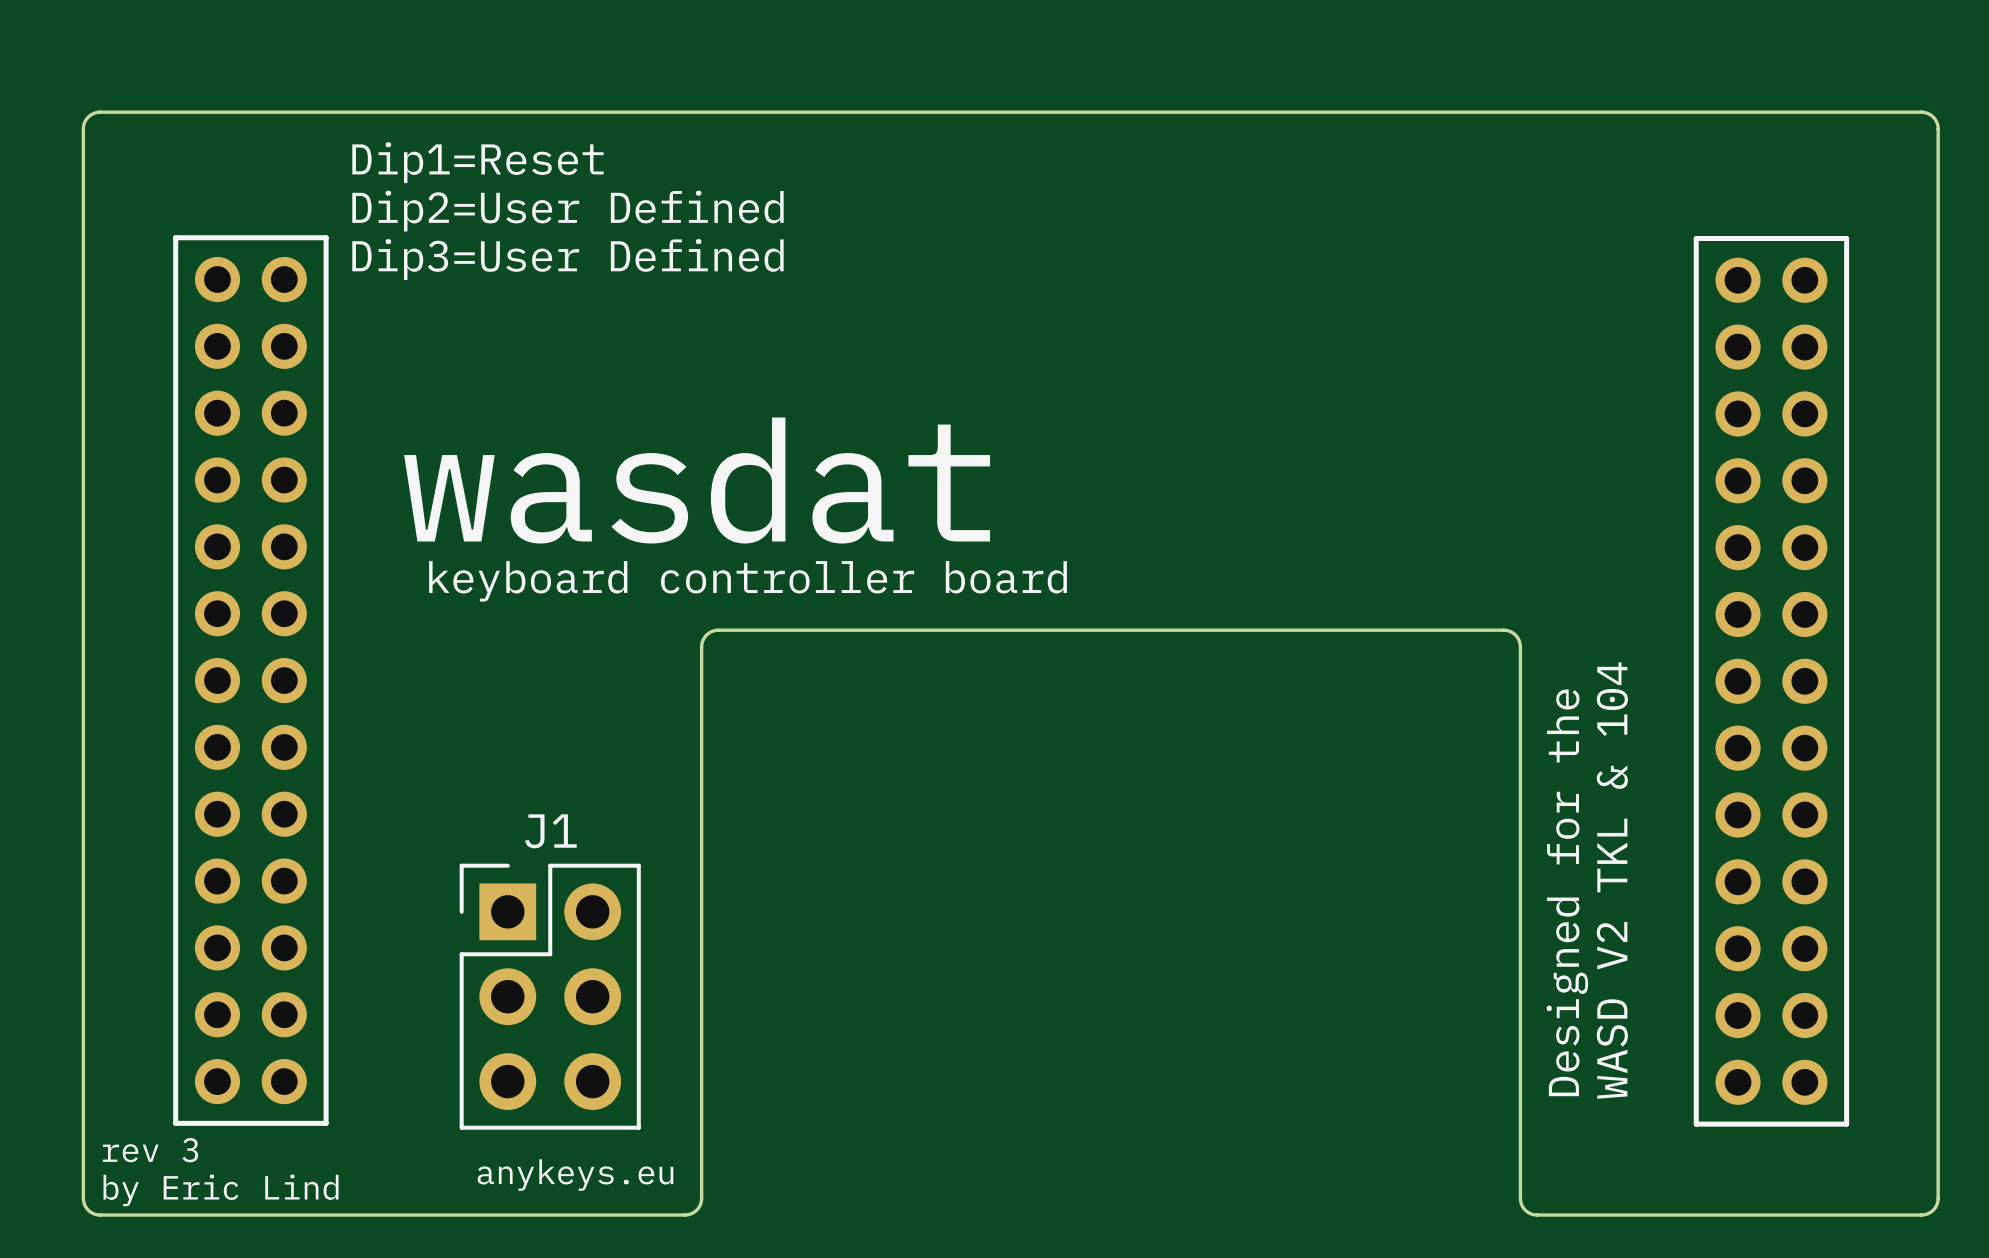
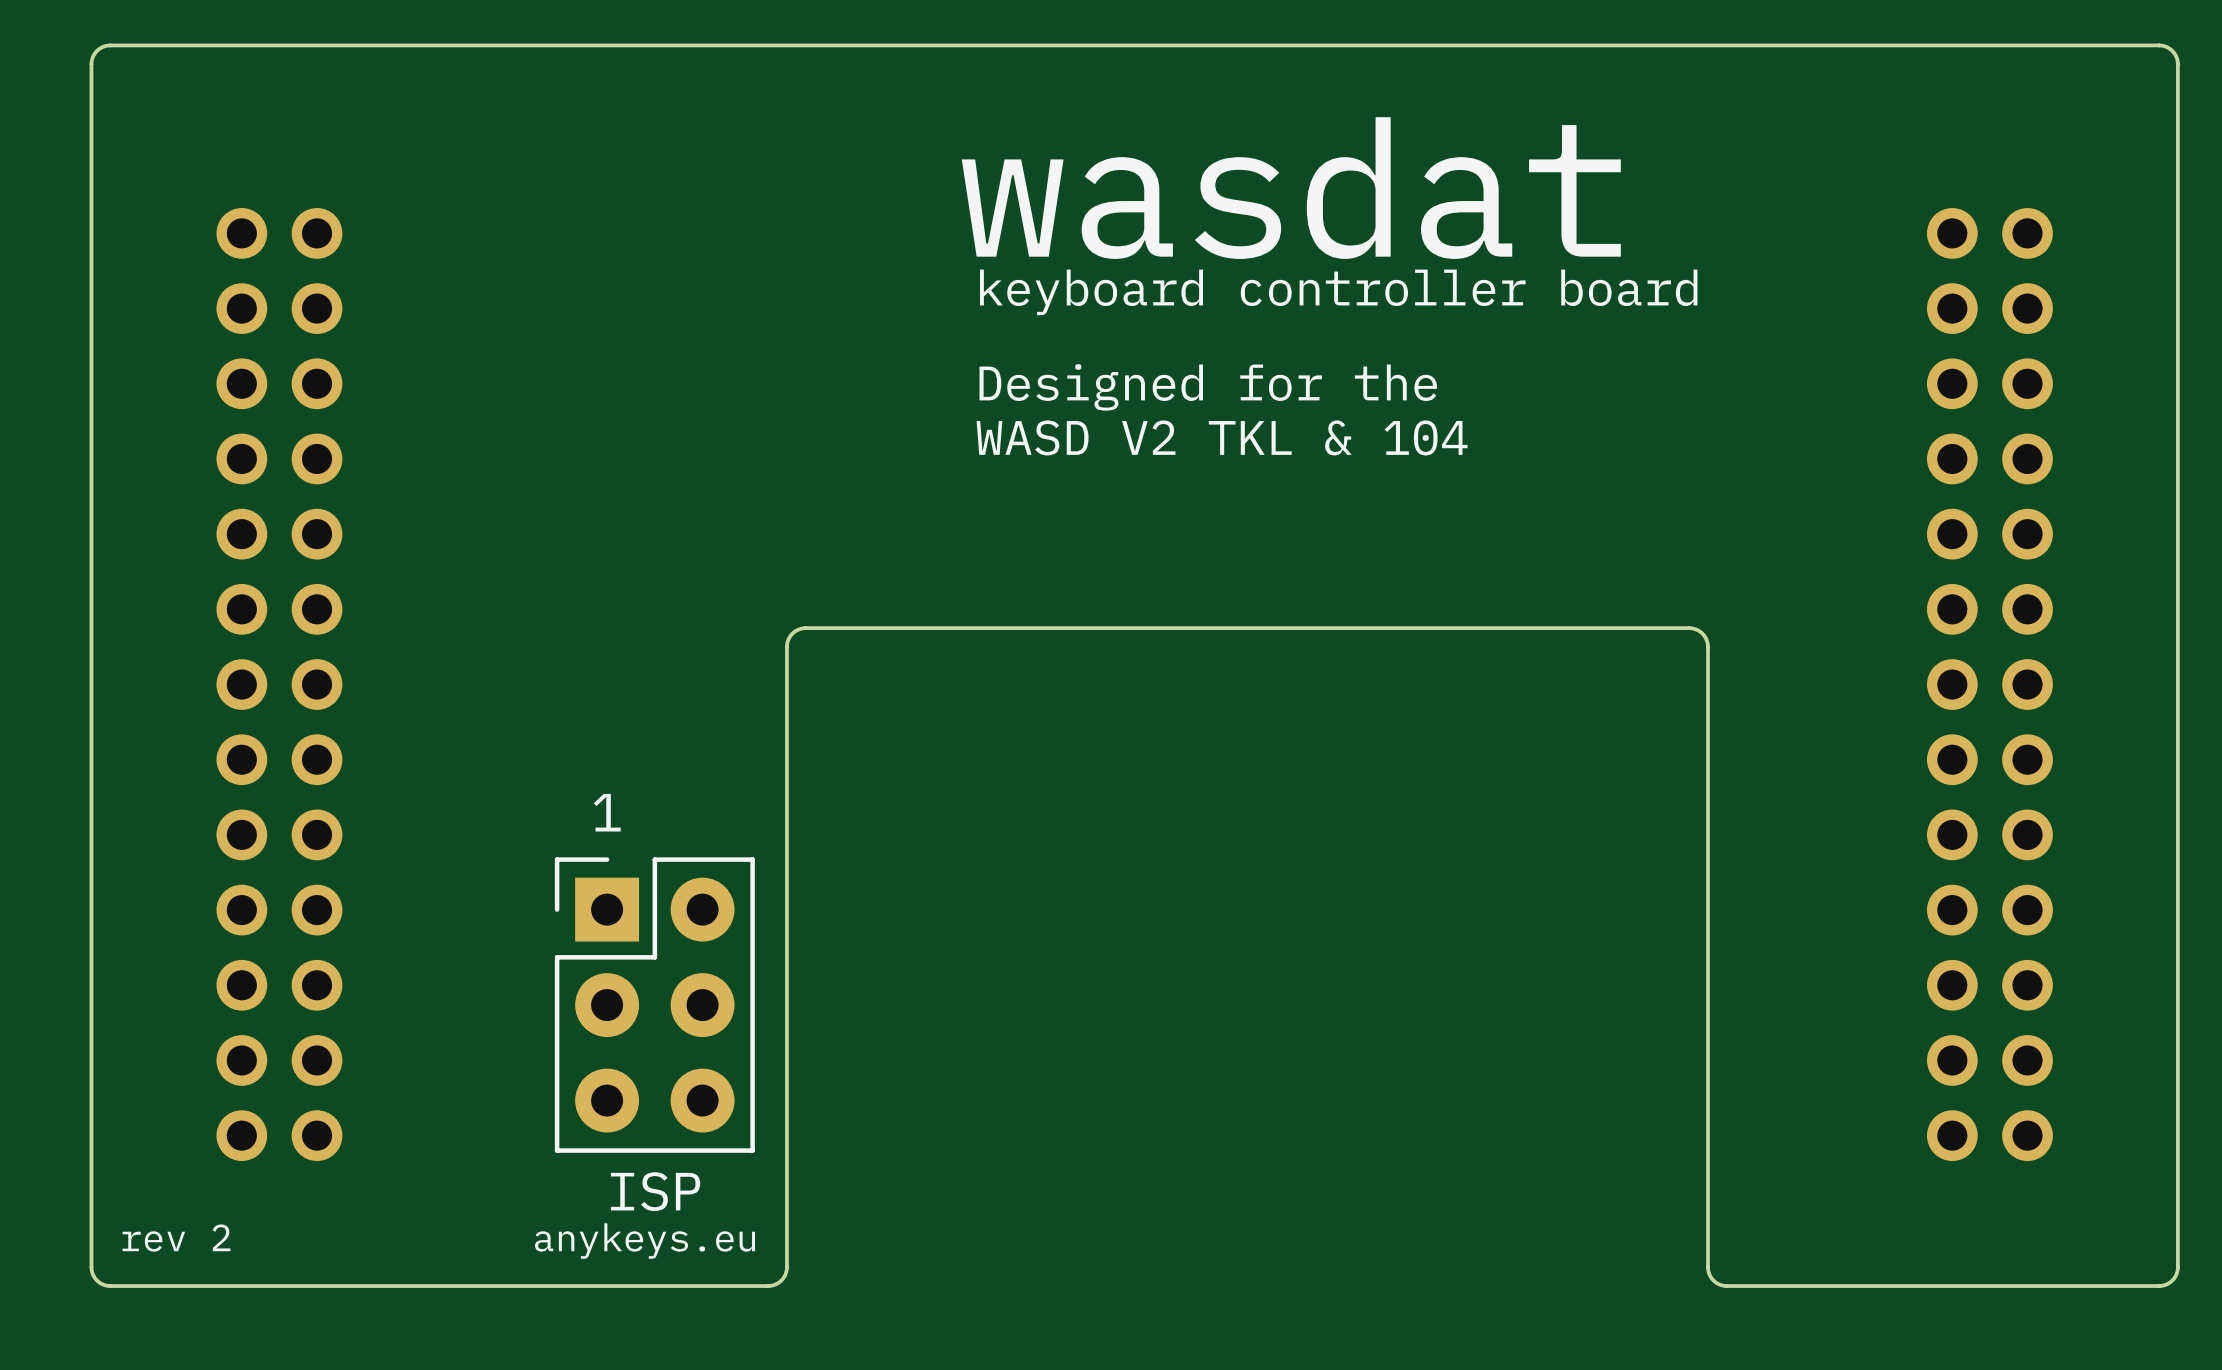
text: Dip1=Reset (477, 162) -> none
text: Dip2=User Defined (567, 211) -> none
text: Dip3=User Defined (567, 259) -> none
text: none -> Designed for the (1208, 387)
text: none -> WASD V2 TKL & 104 (1222, 437)
text position: wasdat (697, 480) -> wasdat (1291, 188)
text position: keyboard controller board (748, 581) -> keyboard controller board (1338, 292)
part side: bottom (250, 680) -> top (279, 684)
part side: bottom (1771, 681) -> top (1989, 684)
text: WASD V2 TKL & 104 (1612, 880) -> none
text: Designed for the (1567, 892) -> none
part: none -> ISP (654, 1005)
J1: (550, 996) -> none
text: rev 3 (150, 1150) -> rev 2 (176, 1238)
text: by Eric Lind (221, 1190) -> none

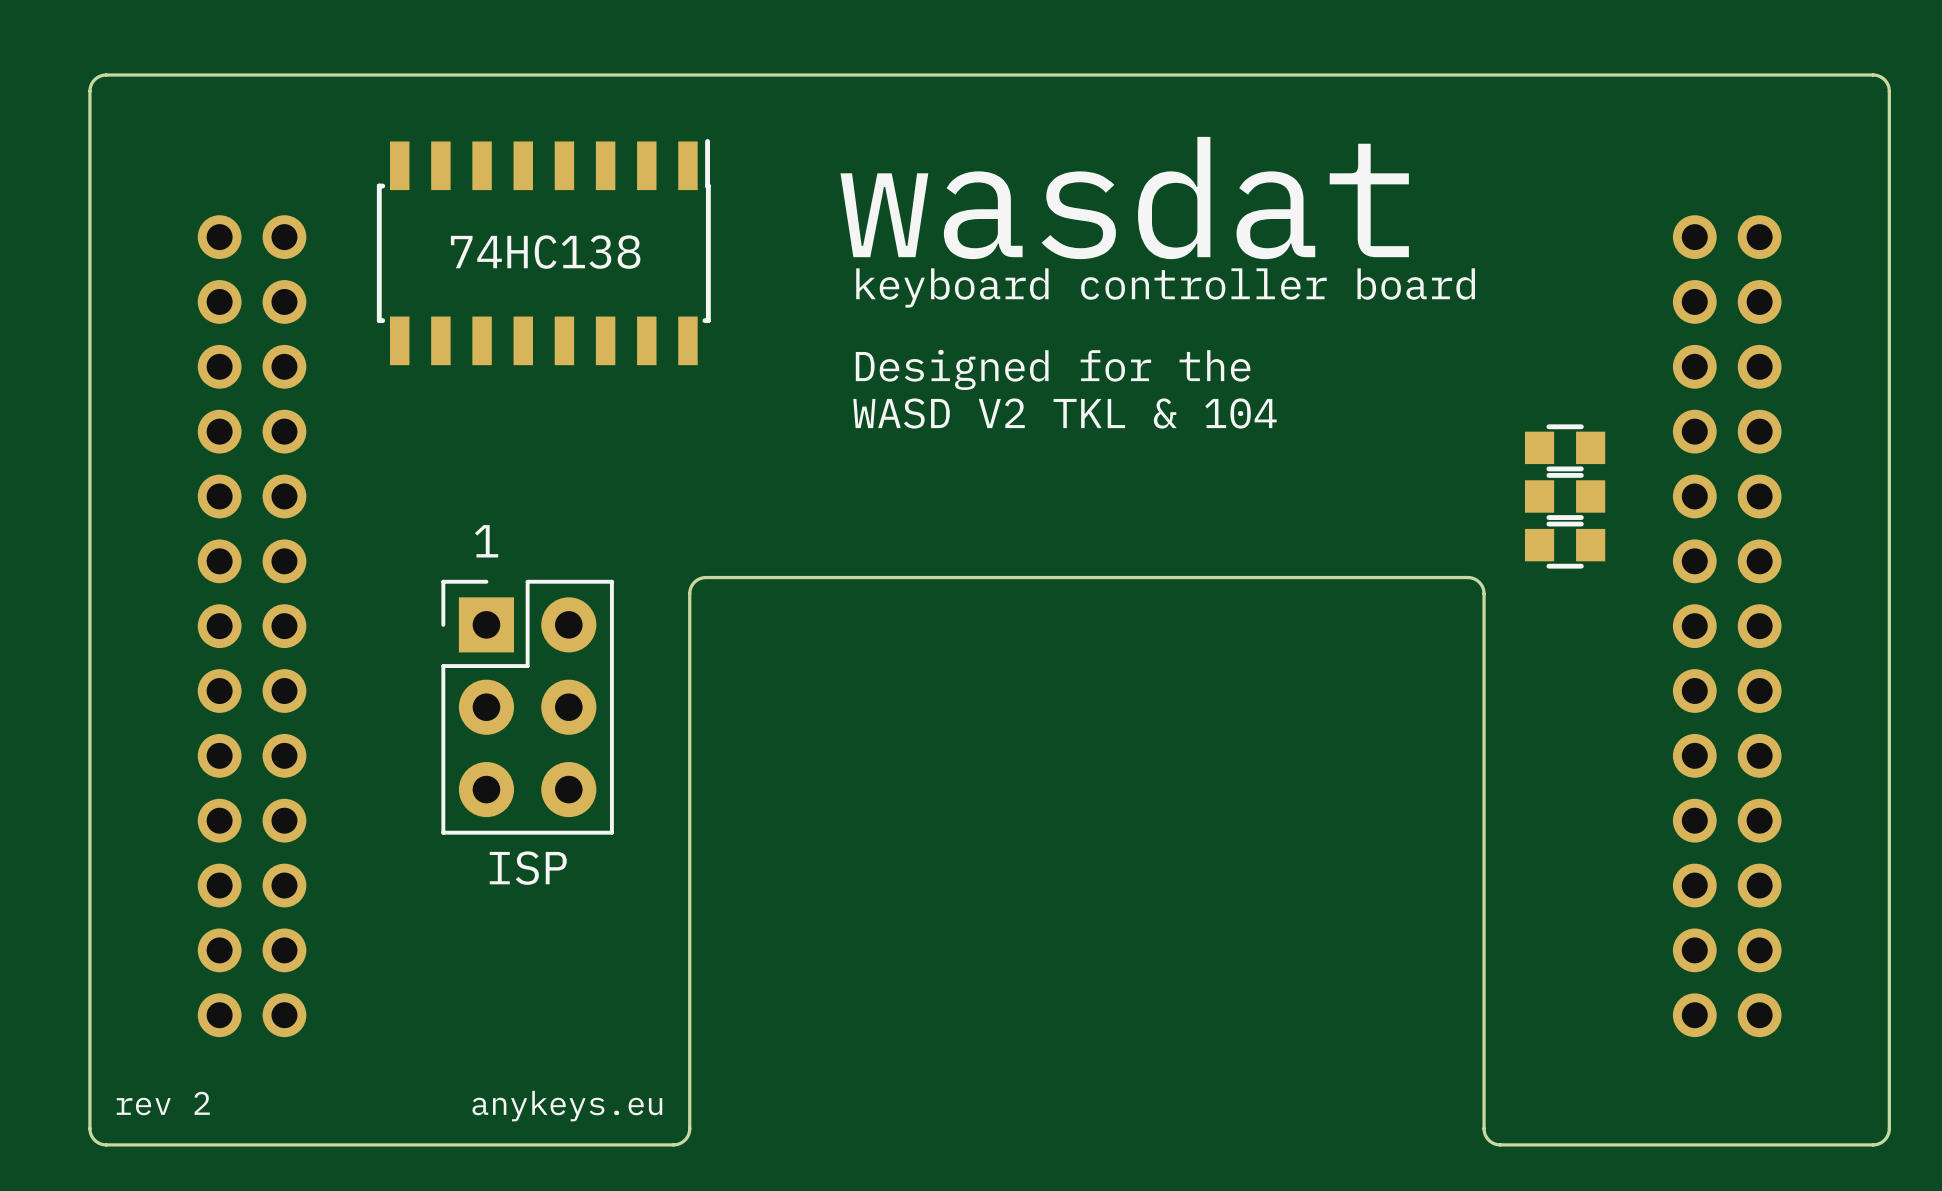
part: none -> 74HC138 (543, 252)
part: none -> (1565, 447)
part: none -> (1565, 496)
part: none -> (1565, 545)
part position: (654, 1005) -> (527, 707)

